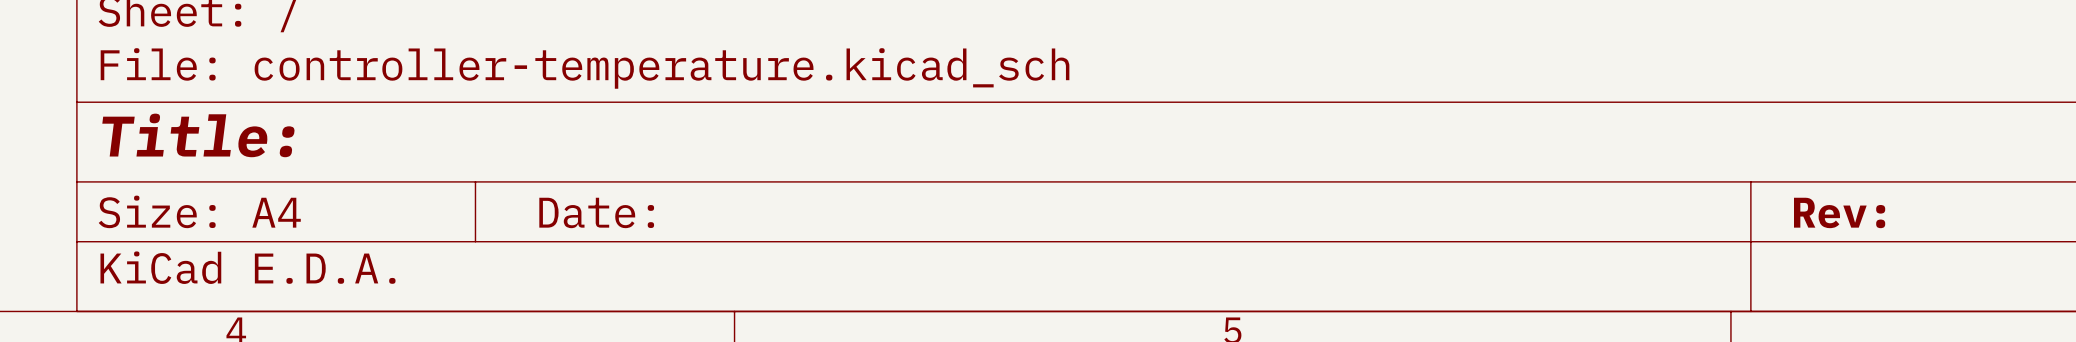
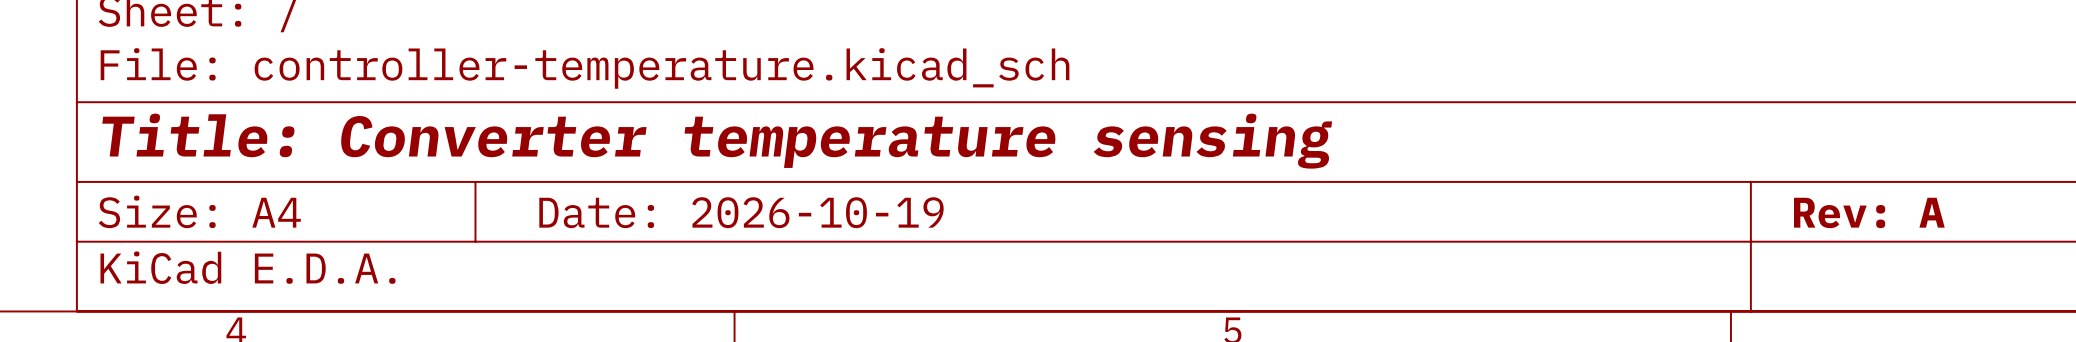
title block: Title: (198, 135) -> Title: Converter temperature sensing (717, 141)
title block: Date: (596, 212) -> Date: 2026-10-19 (741, 212)
title block: Rev: (1839, 212) -> Rev: A (1869, 212)

